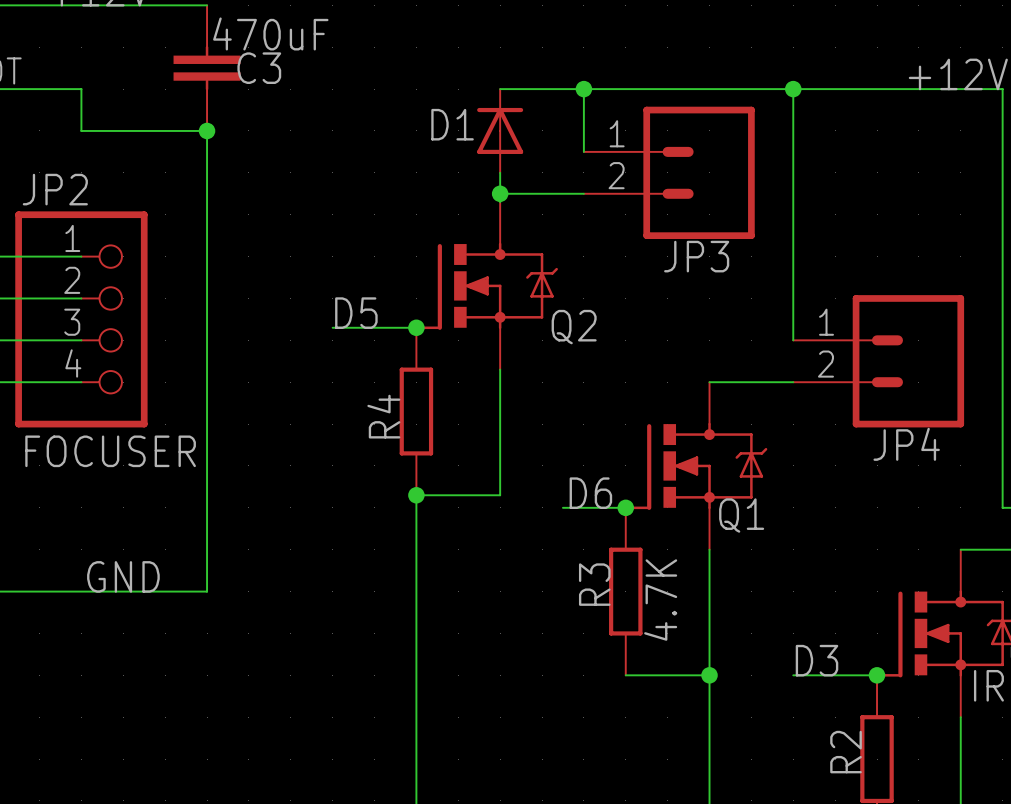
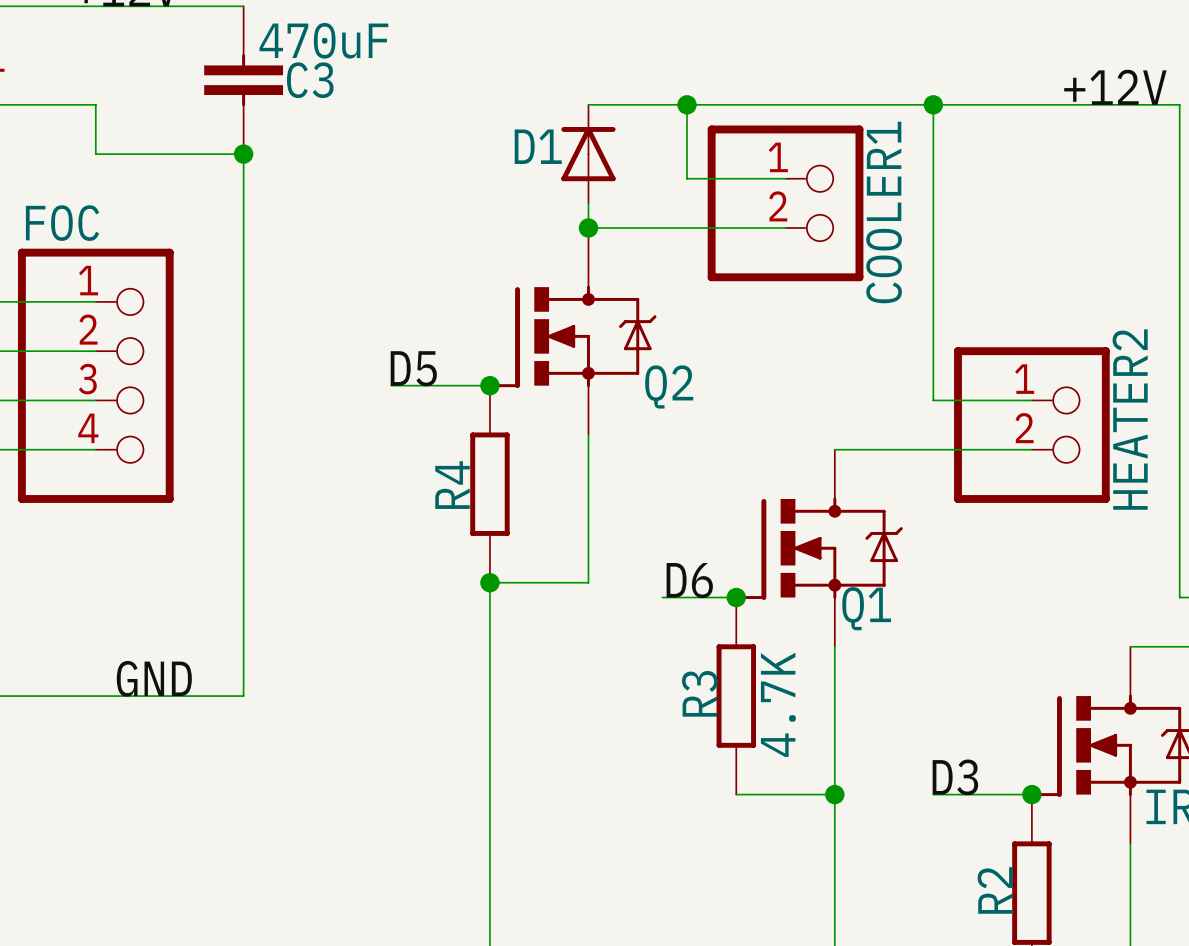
COOLER1: none -> (785, 203)
JP3: (669, 172) -> none
JP2 name: JP2 (55, 189) -> FOC (62, 223)
HEATER2: none -> (1031, 425)
JP4: (878, 361) -> none
JP2 value: FOCUSER (110, 451) -> none

